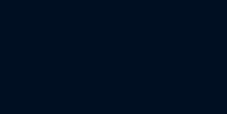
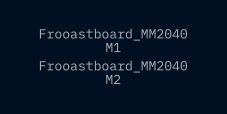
M1: none -> Frooastboard_MM2040 (113, 40)
M2: none -> Frooastboard_MM2040 (113, 72)

